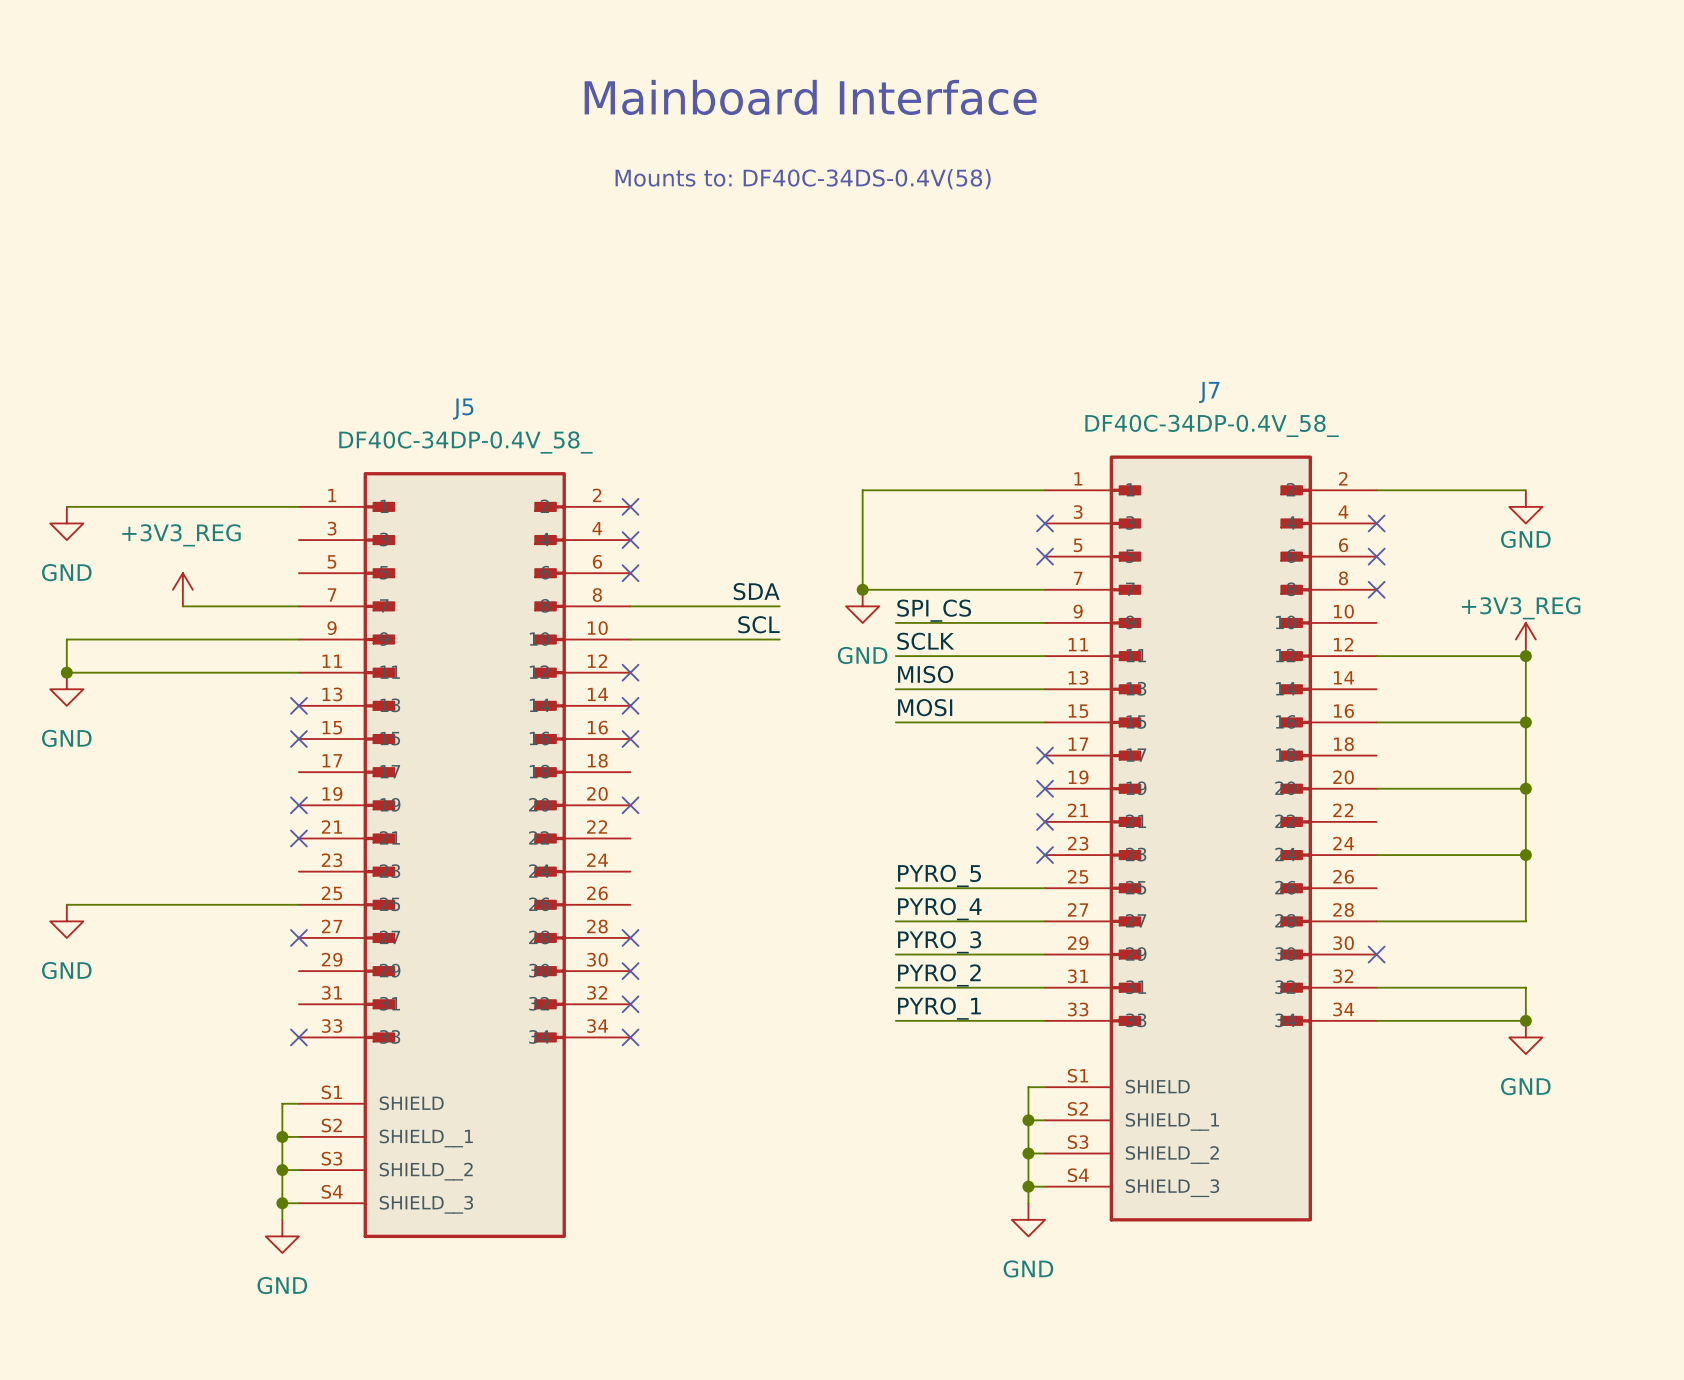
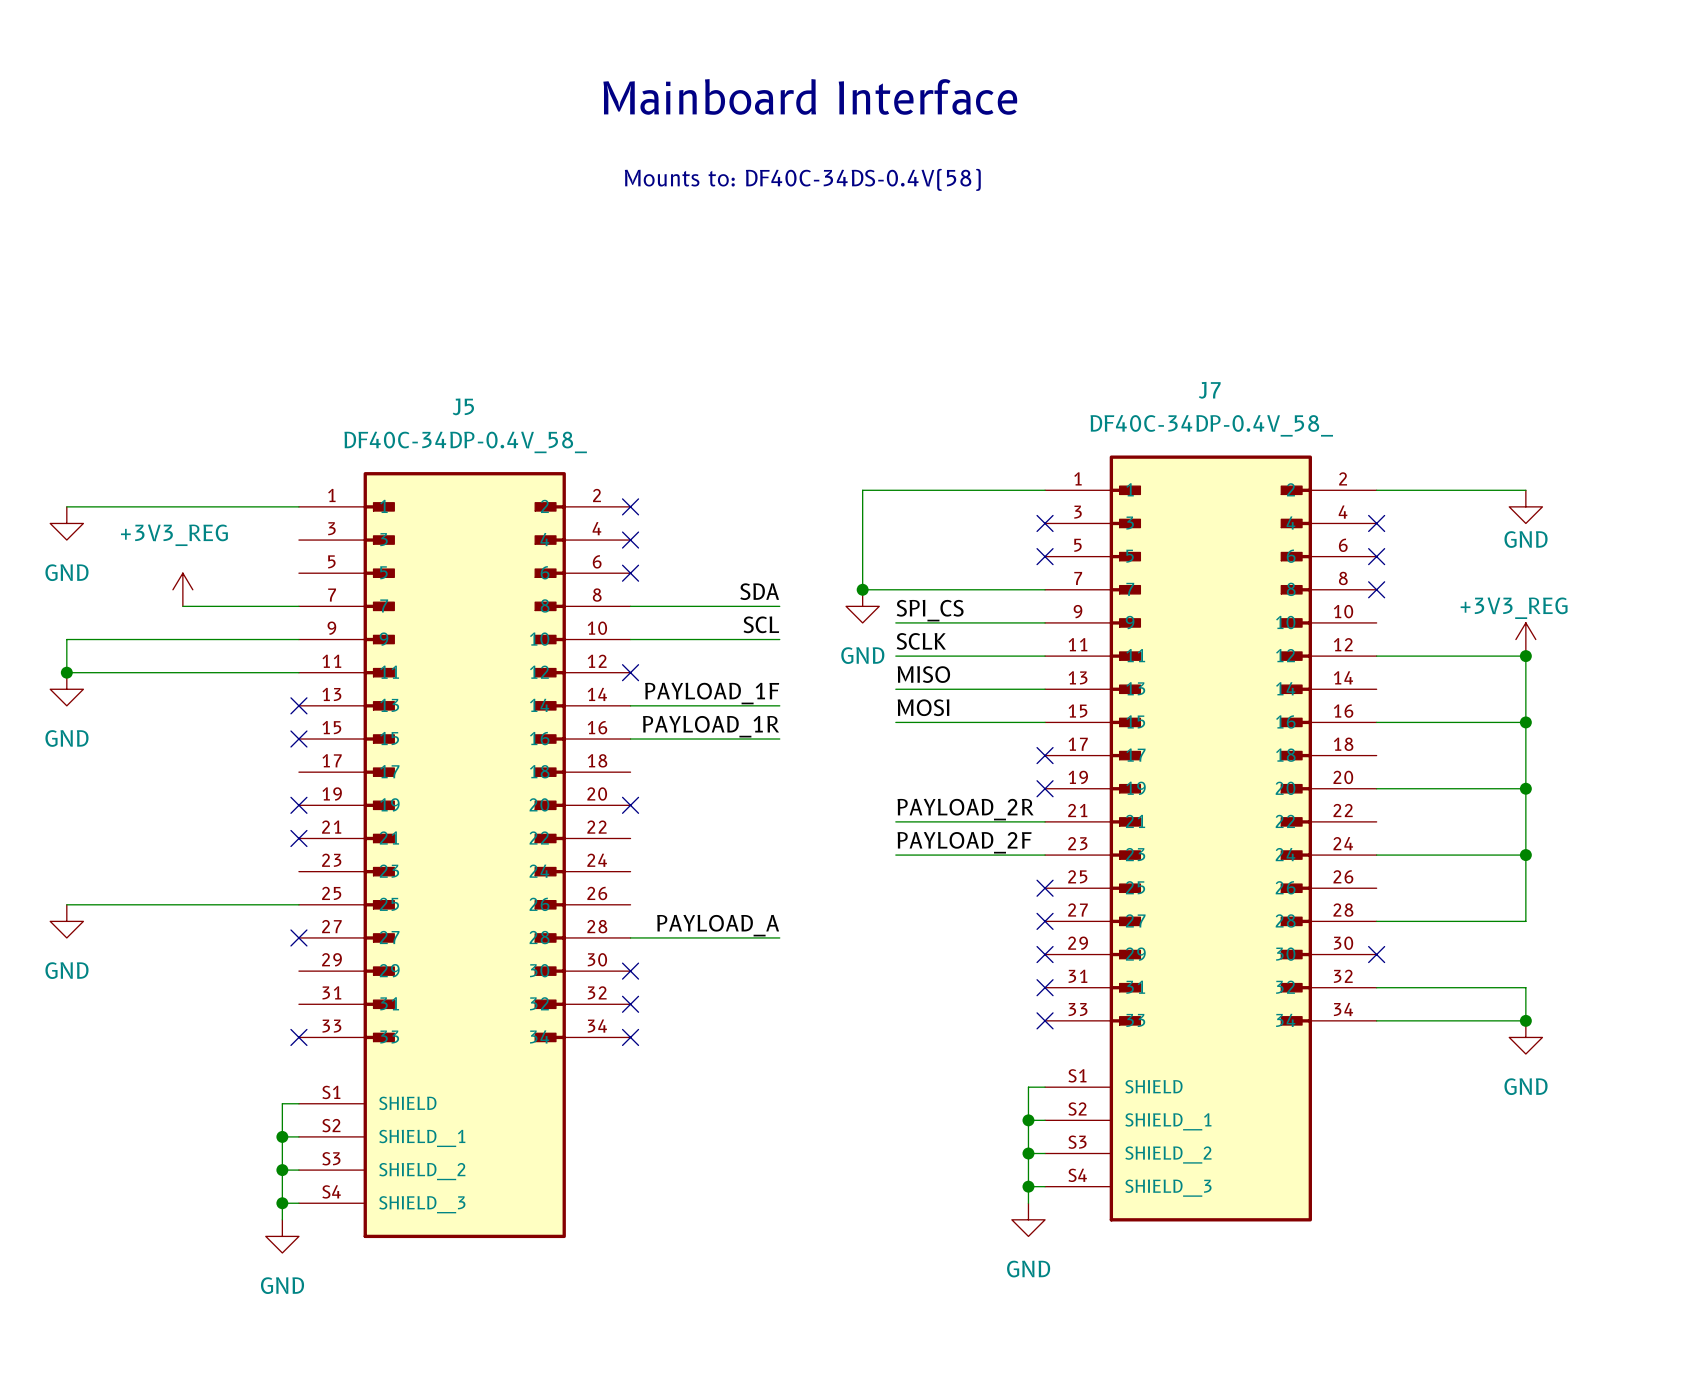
label: none -> PAYLOAD_1F (712, 693)
wire: none -> (630, 705) (779, 705)
no-connect mark: (630, 705) -> none
label: none -> PAYLOAD_1R (710, 726)
wire: none -> (630, 739) (779, 739)
no-connect mark: (630, 739) -> none
label: none -> PAYLOAD_2R (965, 809)
no-connect mark: (1045, 821) -> none
label: none -> PAYLOAD_2F (964, 842)
no-connect mark: (1045, 855) -> none
label: PYRO_5 (939, 875) -> none
wire: (895, 888) (1045, 888) -> (895, 821) (1045, 821)
no-connect mark: none -> (1045, 888)
label: PYRO_4 (939, 909) -> none
wire: (895, 921) (1045, 921) -> (895, 855) (1045, 855)
no-connect mark: none -> (1045, 921)
label: none -> PAYLOAD_A (718, 925)
no-connect mark: (630, 937) -> none
label: PYRO_3 (939, 942) -> none
wire: (895, 954) (1045, 954) -> (630, 937) (779, 937)
no-connect mark: none -> (1045, 954)
label: PYRO_2 (939, 975) -> none
wire: (895, 987) (1045, 987) -> none
no-connect mark: none -> (1045, 987)
label: PYRO_1 (939, 1008) -> none
wire: (895, 1020) (1045, 1020) -> none
no-connect mark: none -> (1045, 1020)

